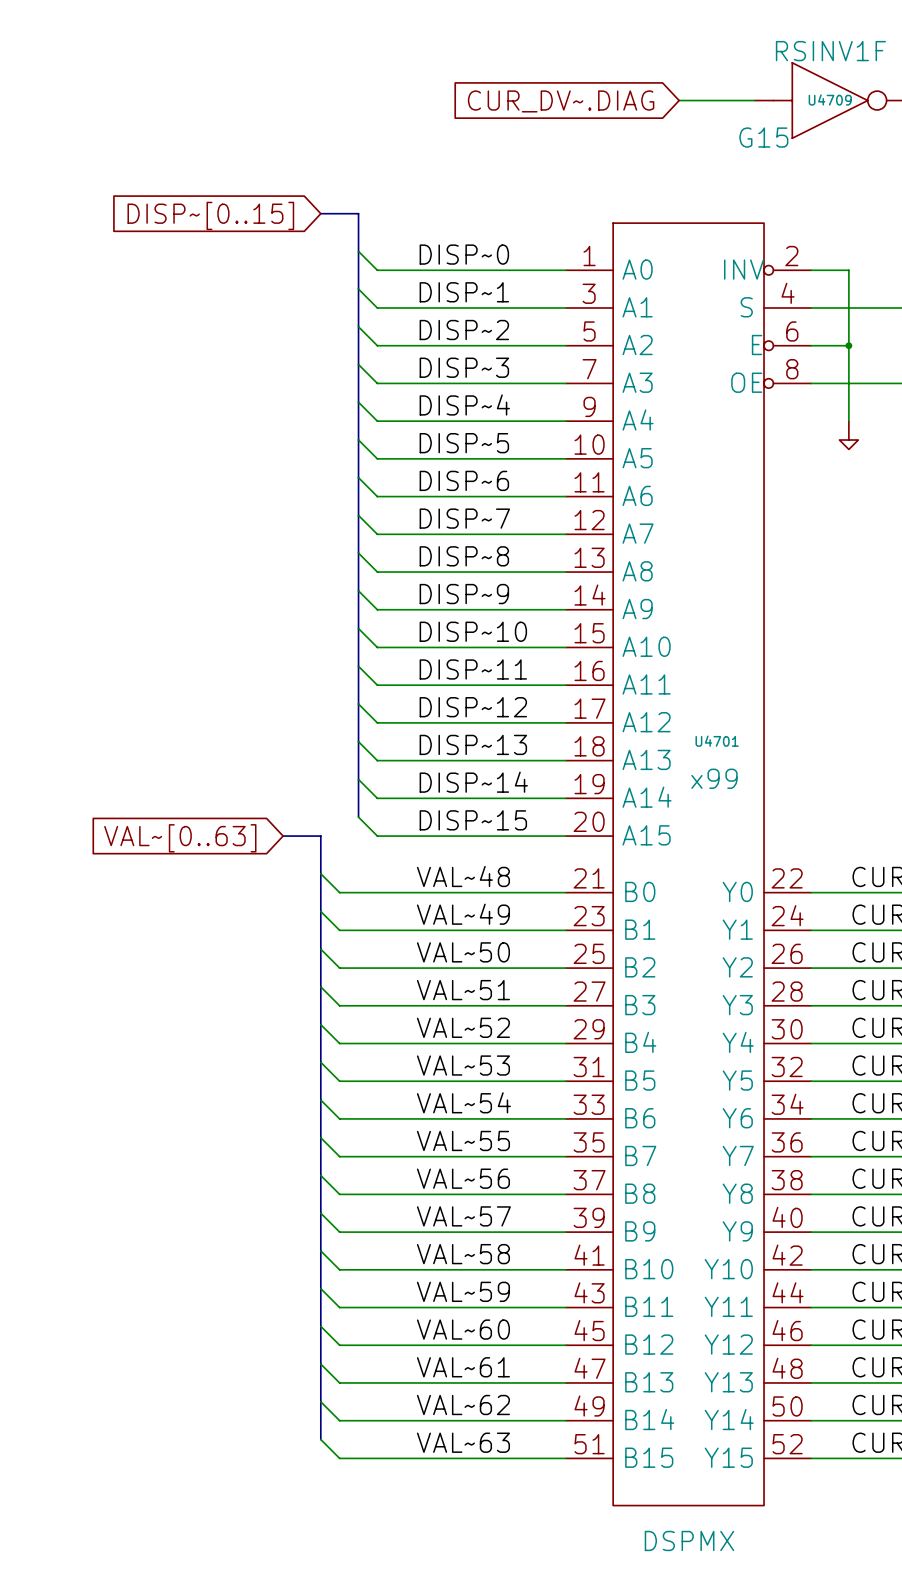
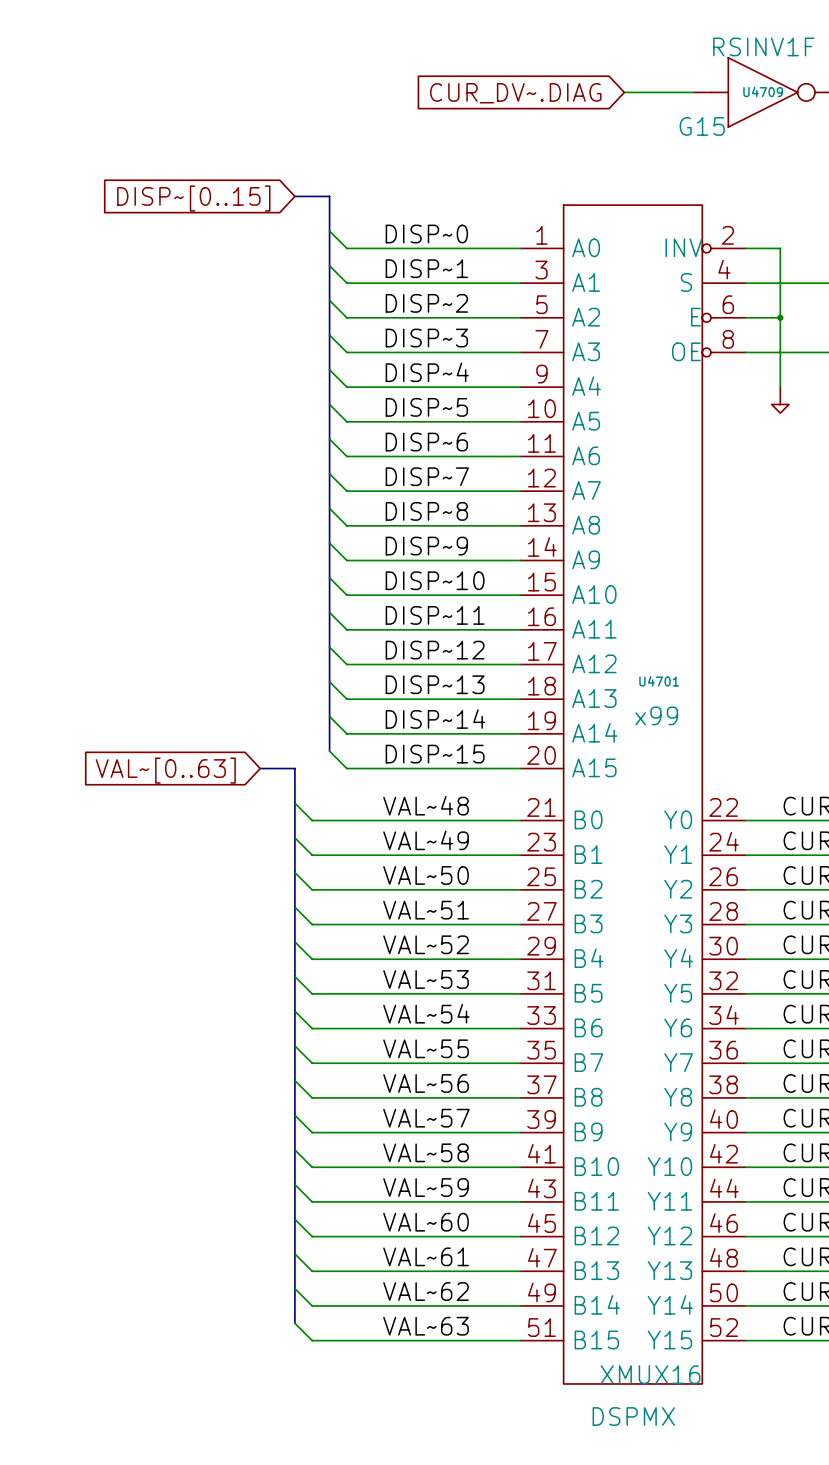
U4701 value: none -> XMUX16 (650, 1374)

